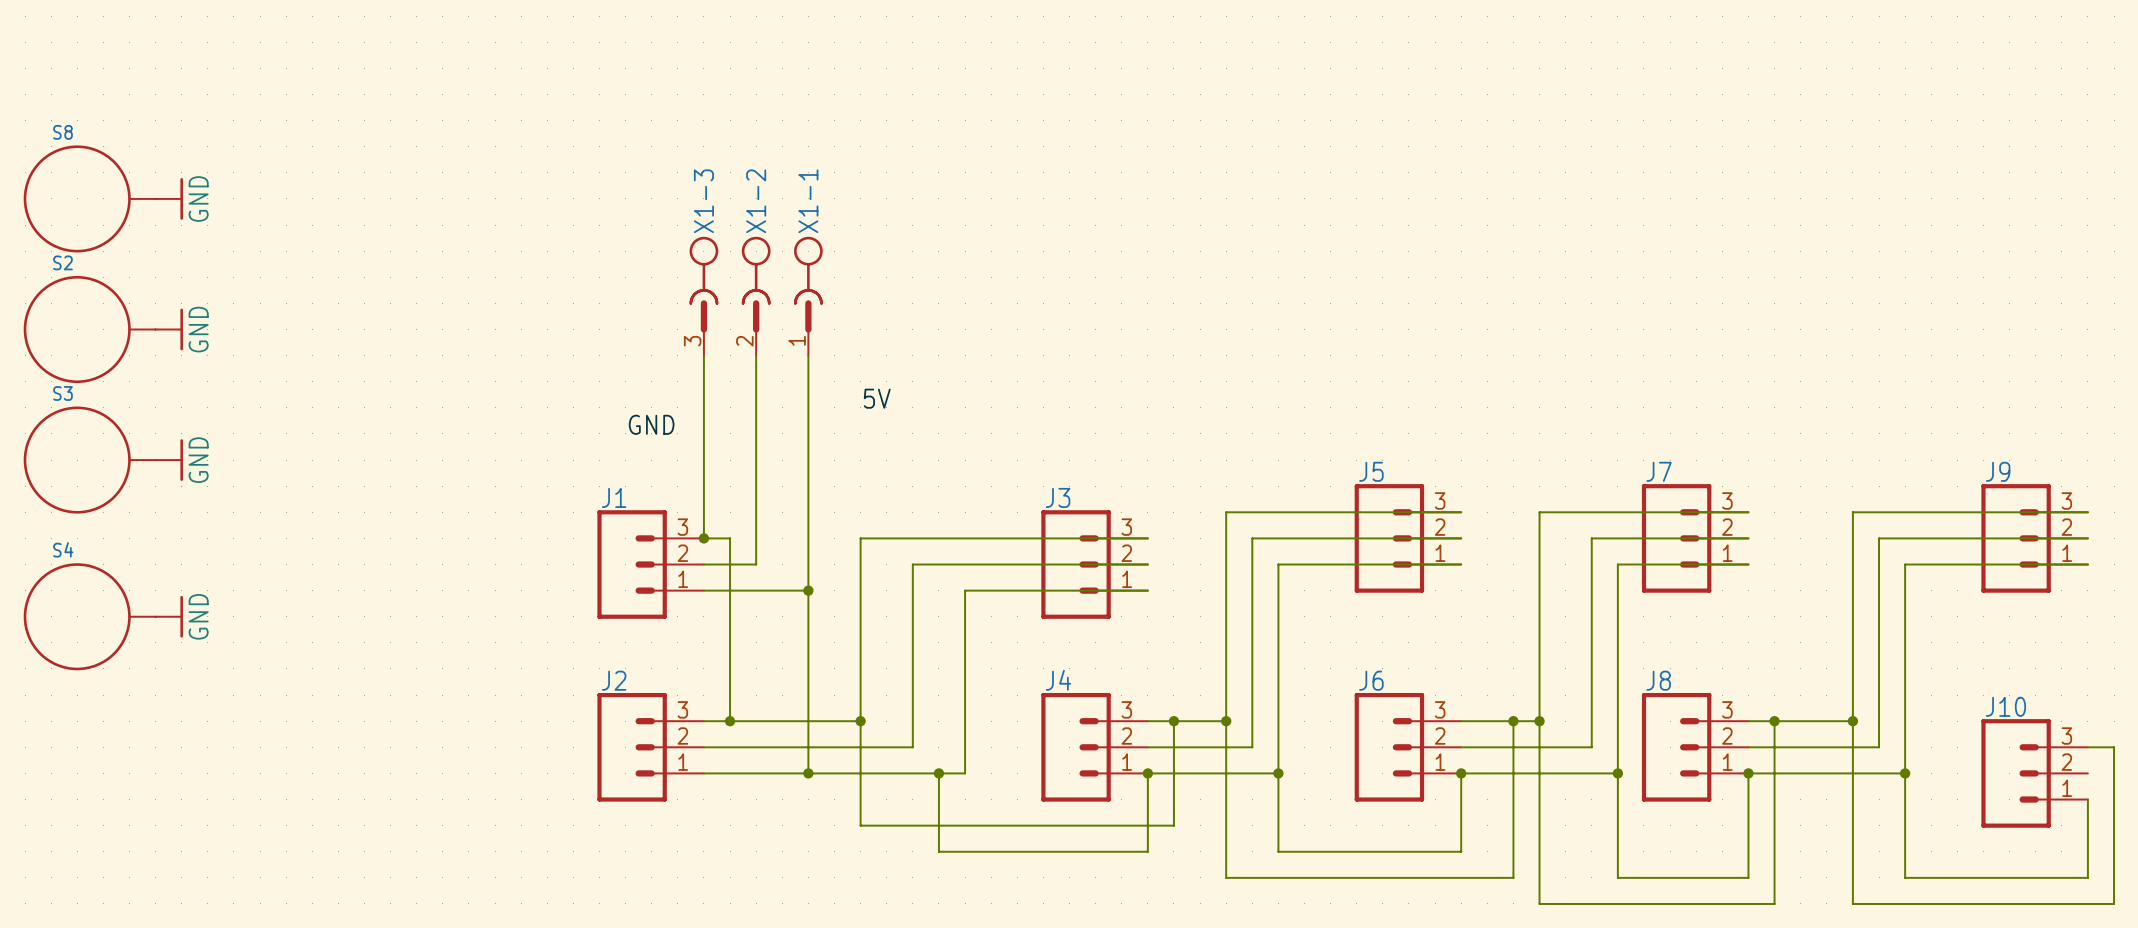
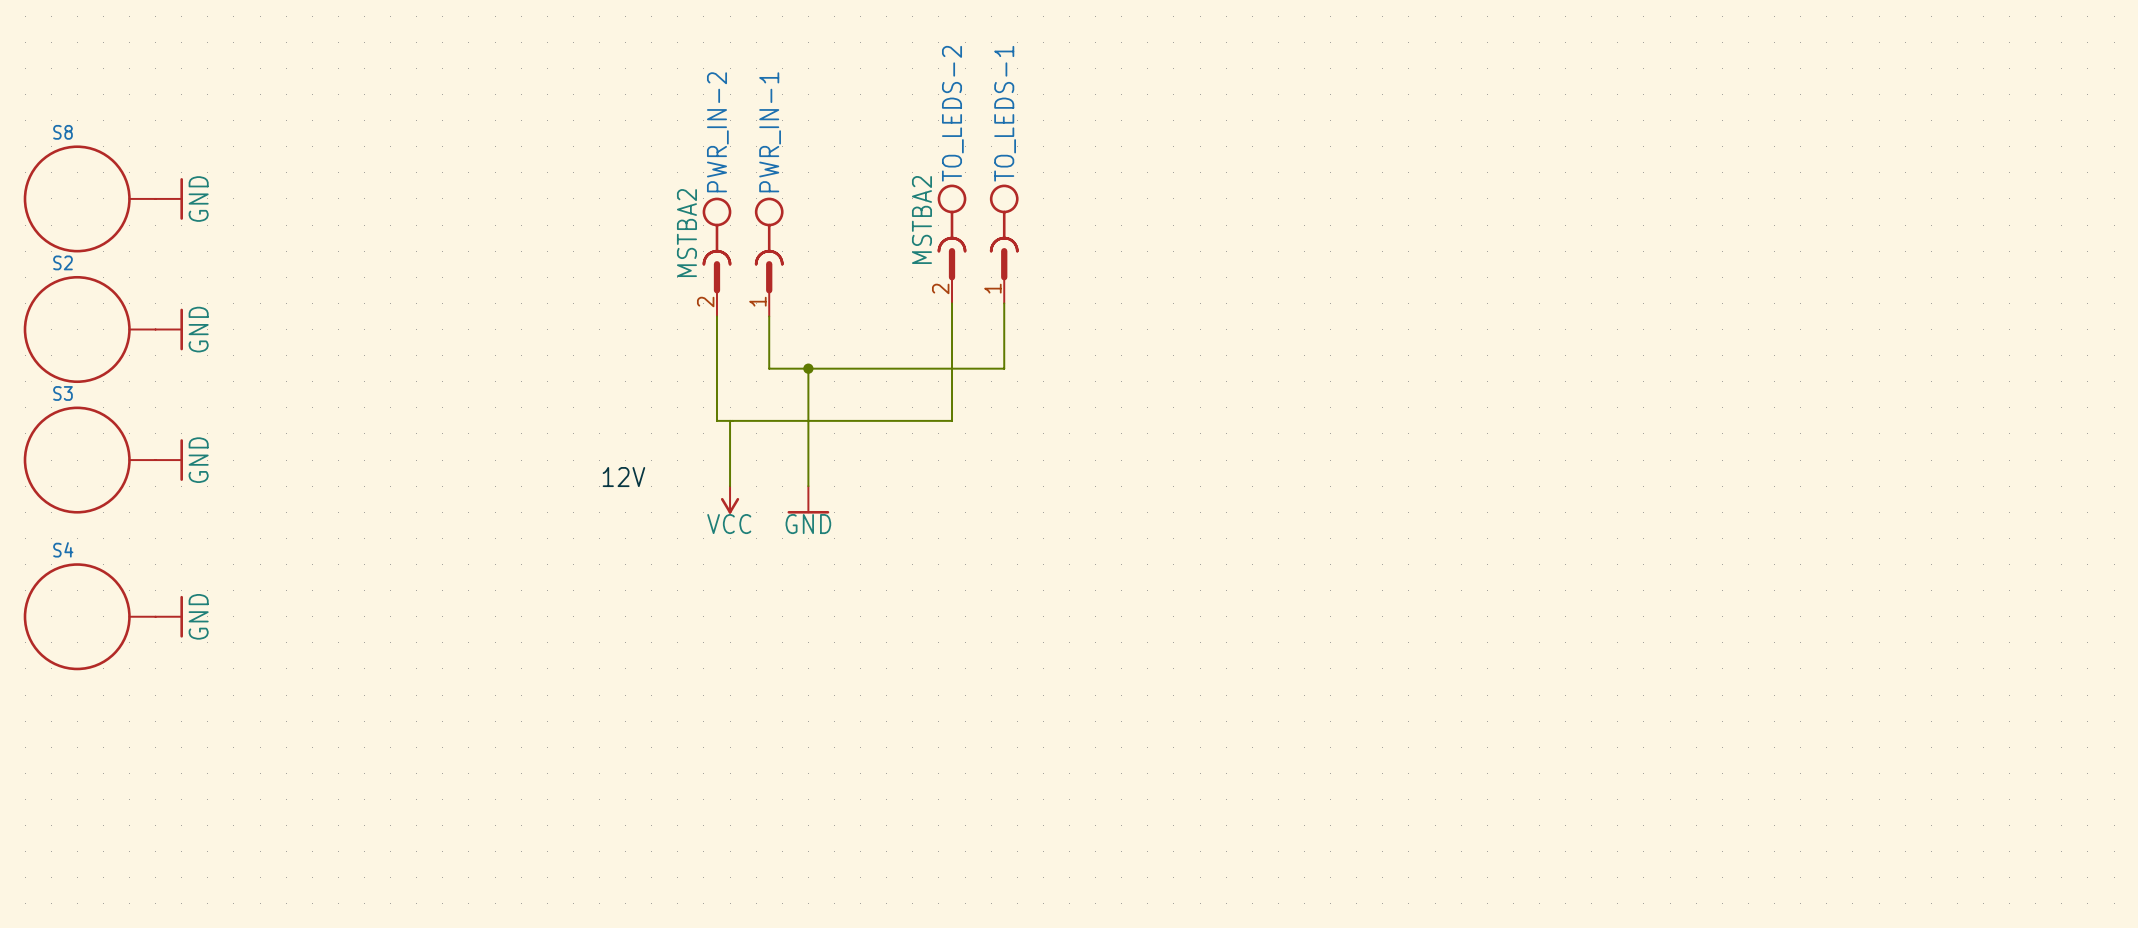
TO_LEDS-2: none -> MSTBA2 (952, 243)
TO_LEDS-1: none -> (1004, 243)
PWR_IN-2: none -> MSTBA2 (716, 257)
PWR_IN-1: none -> (769, 257)
X1-3: (703, 296) -> none
X1-2: (756, 296) -> none
X1-1: (808, 296) -> none
wire: none -> (952, 303) (952, 420) (716, 420) (716, 316)
wire: none -> (1004, 303) (1004, 368) (769, 368) (769, 316)
wire: (703, 355) (703, 538) (730, 538) (730, 721) -> none
wire: (756, 355) (756, 564) (703, 564) -> none
wire: (808, 355) (808, 368) -> none
junction: none -> (808, 368)
label: 5V (877, 398) -> none
wire: none -> (730, 420) (730, 486)
label: GND (651, 424) -> none
label: none -> 12V (623, 477)
wire: (808, 486) (808, 773) -> none
power symbol: none -> VCC (730, 499)
power symbol: none -> GND (808, 499)
wire: (1461, 512) (1226, 512) (1226, 877) (1513, 877) (1513, 721) -> none
wire: (1748, 512) (1539, 512) (1539, 903) (1774, 903) (1774, 721) -> none
wire: (2087, 512) (1852, 512) (1852, 903) (2114, 903) (2114, 747) (2087, 747) -> none
junction: (703, 538) -> none
wire: (1147, 538) (860, 538) (860, 825) (1173, 825) (1173, 721) -> none
J5: (1407, 538) -> none
wire: (1461, 538) (1252, 538) (1252, 747) (1147, 747) -> none
J7: (1695, 538) -> none
wire: (1748, 538) (1591, 538) (1591, 747) (1461, 747) -> none
J9: (2034, 538) -> none
wire: (2087, 538) (1879, 538) (1879, 747) (1748, 747) -> none
J1: (650, 564) -> none
J3: (1094, 564) -> none
wire: (1147, 564) (912, 564) (912, 747) (703, 747) -> none
wire: (1461, 564) (1278, 564) (1278, 851) (1461, 851) (1461, 773) (1617, 773) -> none
wire: (1748, 564) (1617, 564) (1617, 877) (1748, 877) (1748, 773) (1905, 773) -> none
wire: (2087, 564) (1905, 564) (1905, 877) (2087, 877) (2087, 799) -> none
wire: (703, 590) (808, 590) -> none
junction: (808, 590) -> none
wire: (1147, 590) (965, 590) (965, 773) (703, 773) -> none
wire: (703, 721) (860, 721) -> none
junction: (730, 721) -> none
junction: (860, 721) -> none
wire: (1147, 721) (1226, 721) -> none
junction: (1173, 721) -> none
junction: (1226, 721) -> none
wire: (1461, 721) (1539, 721) -> none
junction: (1513, 721) -> none
junction: (1539, 721) -> none
wire: (1748, 721) (1852, 721) -> none
junction: (1774, 721) -> none
junction: (1852, 721) -> none
J2: (650, 747) -> none
J4: (1094, 747) -> none
J6: (1407, 747) -> none
J8: (1695, 747) -> none
junction: (808, 773) -> none
wire: (938, 773) (938, 851) (1147, 851) (1147, 773) (1278, 773) -> none
junction: (938, 773) -> none
junction: (1147, 773) -> none
junction: (1278, 773) -> none
junction: (1461, 773) -> none
junction: (1617, 773) -> none
junction: (1748, 773) -> none
junction: (1905, 773) -> none
J10: (2034, 773) -> none

